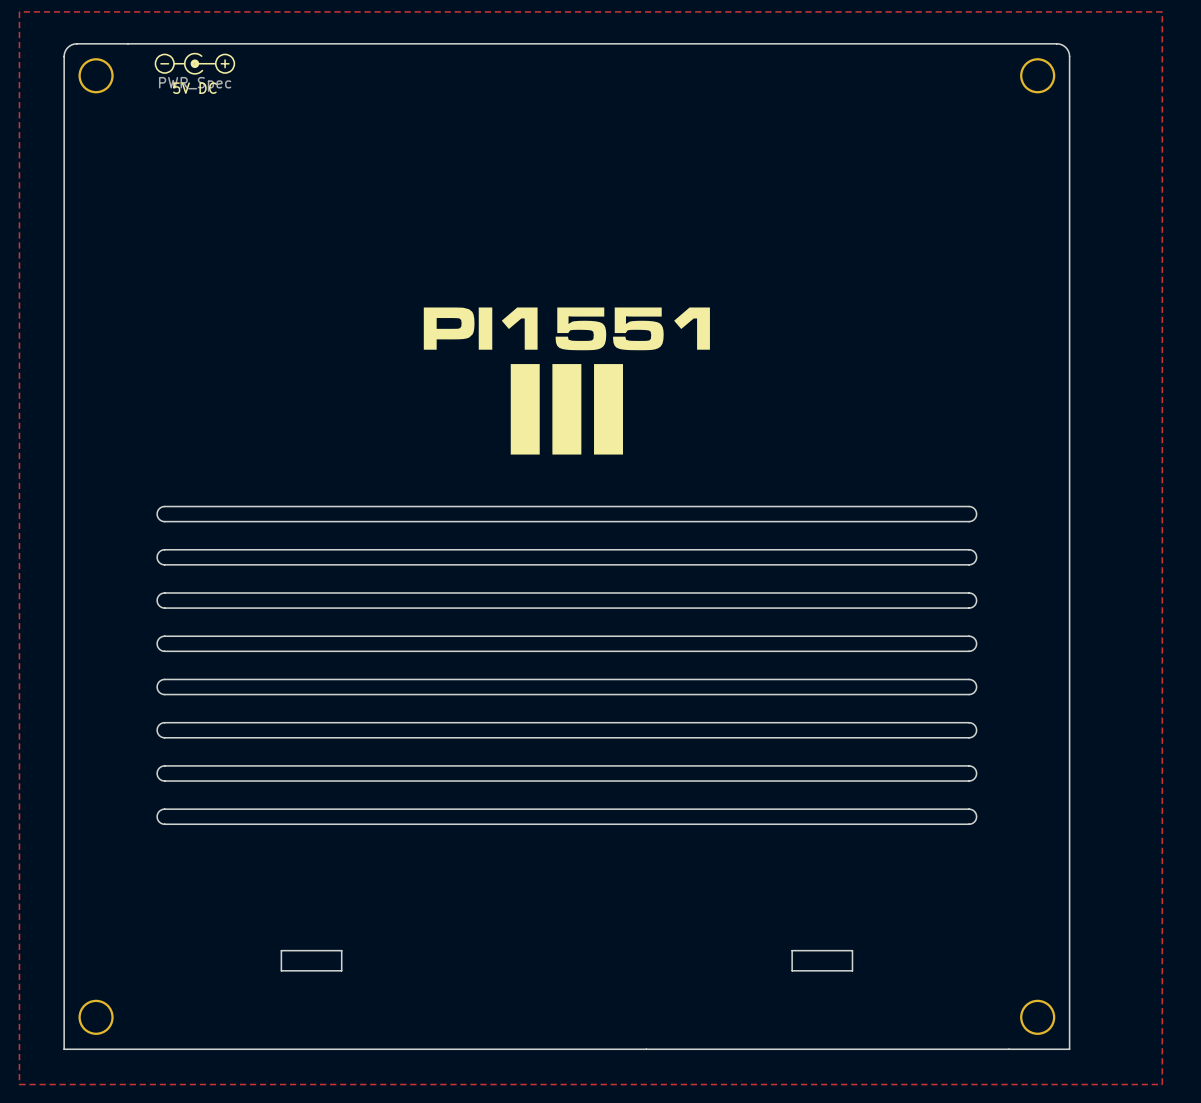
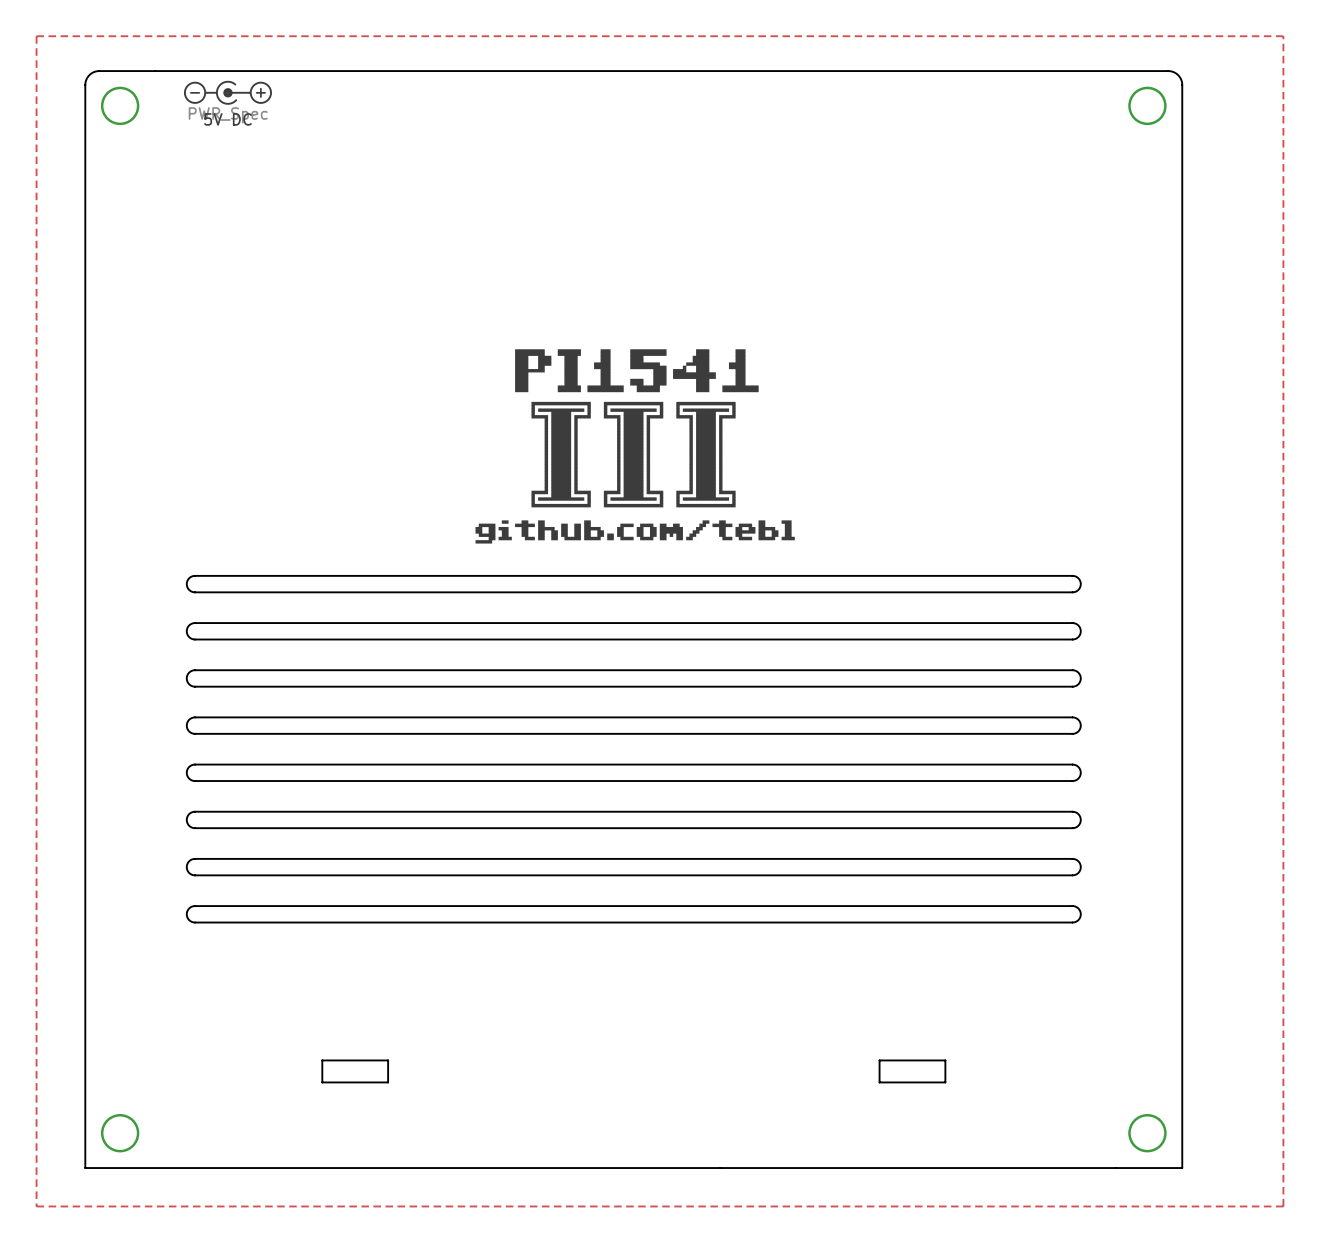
drawing: none -> [475, 349, 795, 544]
drawing: [423, 307, 710, 351] -> none
drawing: [510, 364, 623, 455] -> none

